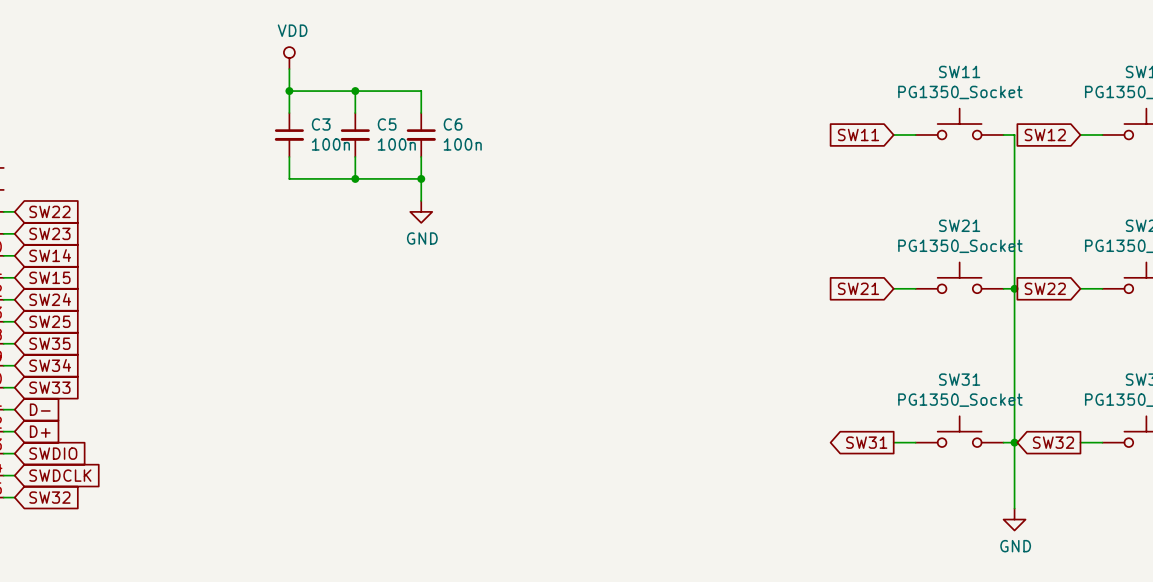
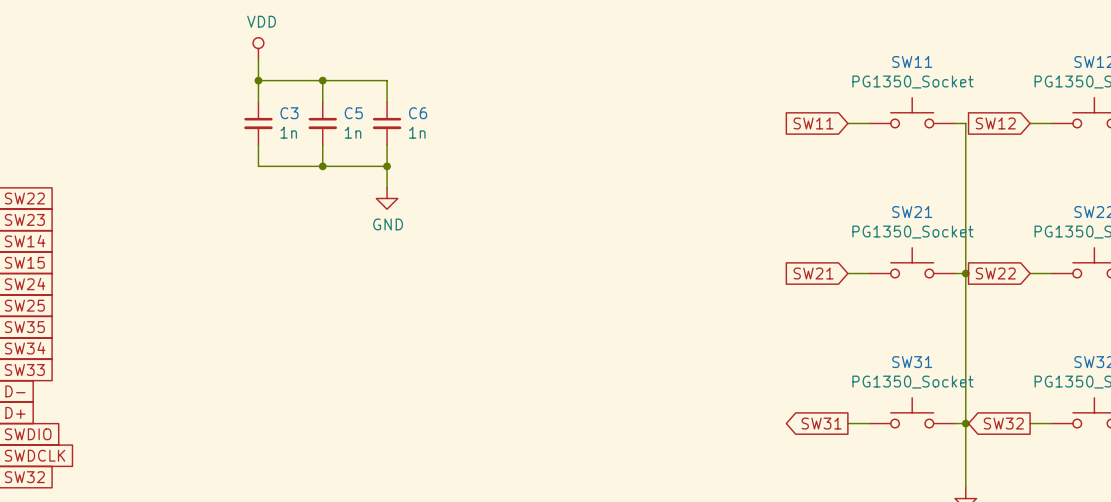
C3 value: 100n (330, 144) -> 1n (288, 132)
C5 value: 100n (396, 144) -> 1n (353, 132)
C6 value: 100n (462, 144) -> 1n (417, 132)

